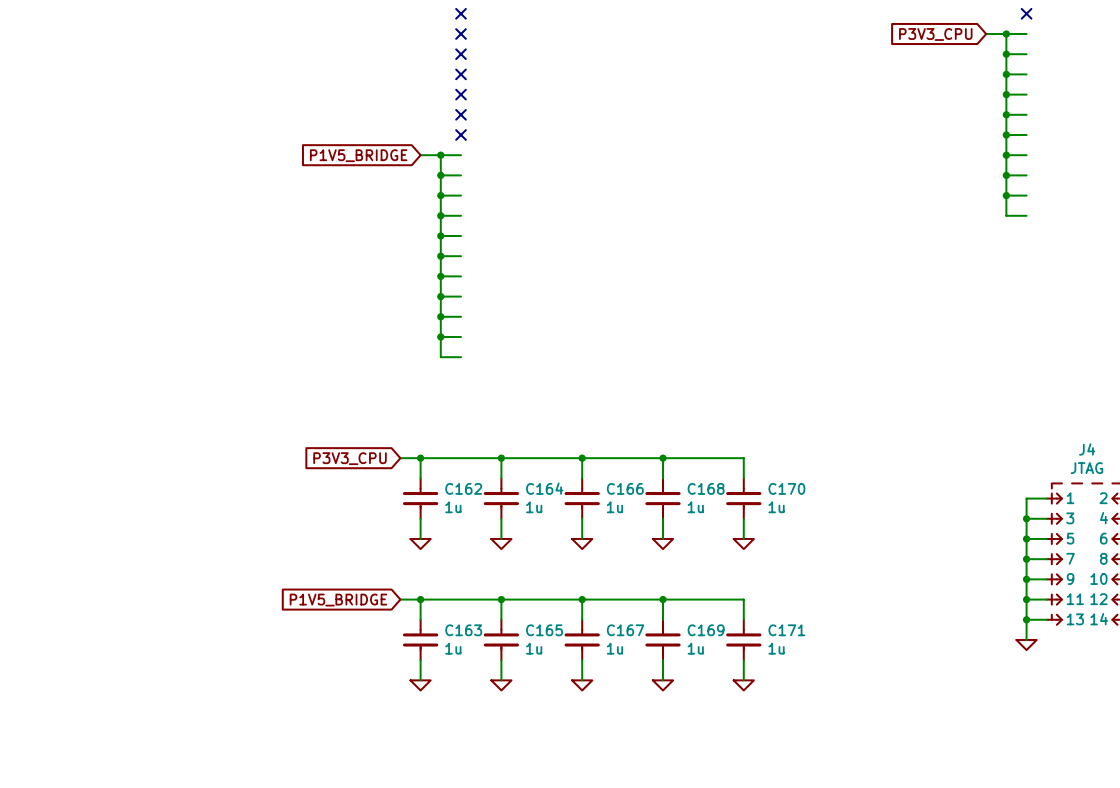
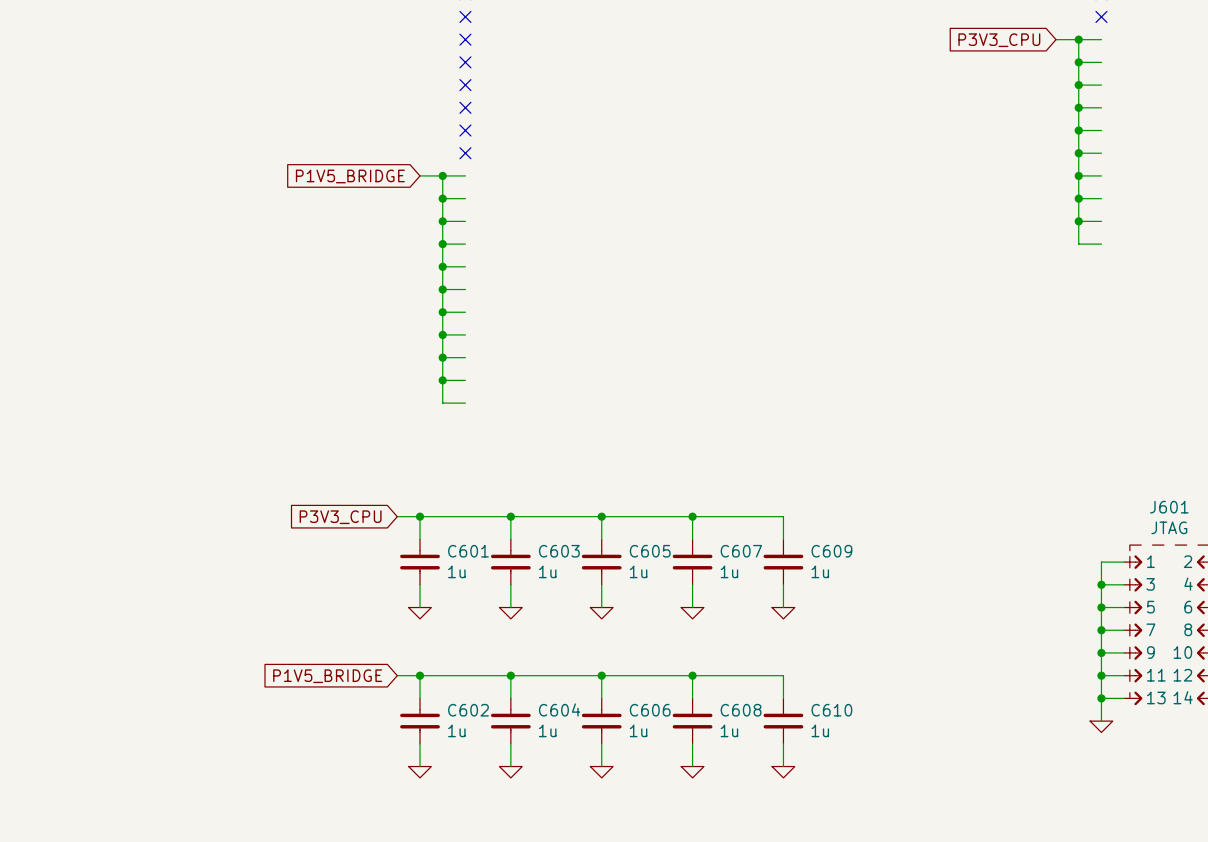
J4 name: J4 (1087, 449) -> J601 (1169, 507)
C162 name: C162 (463, 488) -> C601 (468, 551)
C164 name: C164 (544, 488) -> C603 (559, 551)
C166 name: C166 (625, 488) -> C605 (650, 551)
C168 name: C168 (706, 488) -> C607 (741, 551)
C170 name: C170 (786, 488) -> C609 (831, 551)
C163 name: C163 (463, 630) -> C602 (468, 710)
C165 name: C165 (544, 630) -> C604 (559, 709)
C167 name: C167 (625, 630) -> C606 (650, 710)
C169 name: C169 (706, 630) -> C608 (741, 710)
C171 name: C171 (786, 630) -> C610 (831, 710)

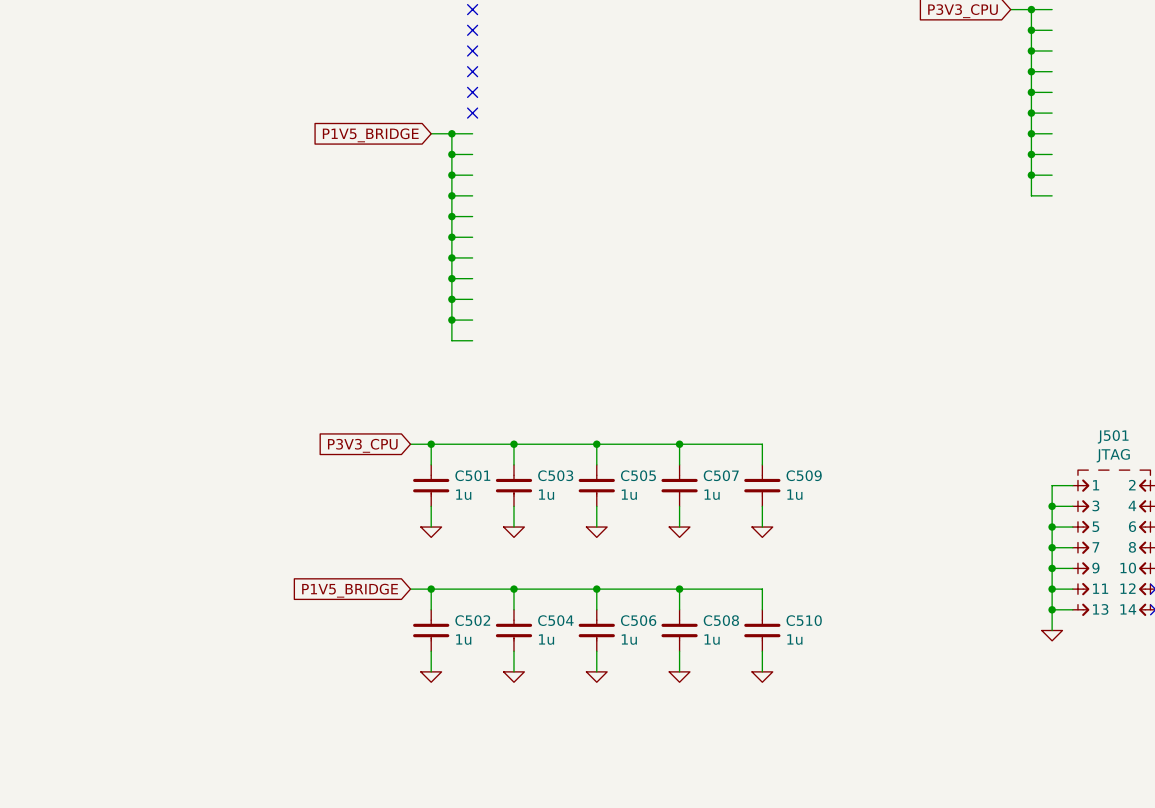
J601 name: J601 (1169, 507) -> J501 (1113, 436)
C601 name: C601 (468, 551) -> C501 (472, 475)
C603 name: C603 (559, 551) -> C503 (555, 475)
C605 name: C605 (650, 551) -> C505 (638, 475)
C607 name: C607 (741, 551) -> C507 (721, 475)
C609 name: C609 (831, 551) -> C509 (804, 475)
C604 name: C604 (559, 709) -> C504 (555, 620)
C602 name: C602 (468, 710) -> C502 (472, 620)
C606 name: C606 (650, 710) -> C506 (638, 620)
C608 name: C608 (741, 710) -> C508 (721, 620)
C610 name: C610 (831, 710) -> C510 (804, 620)

